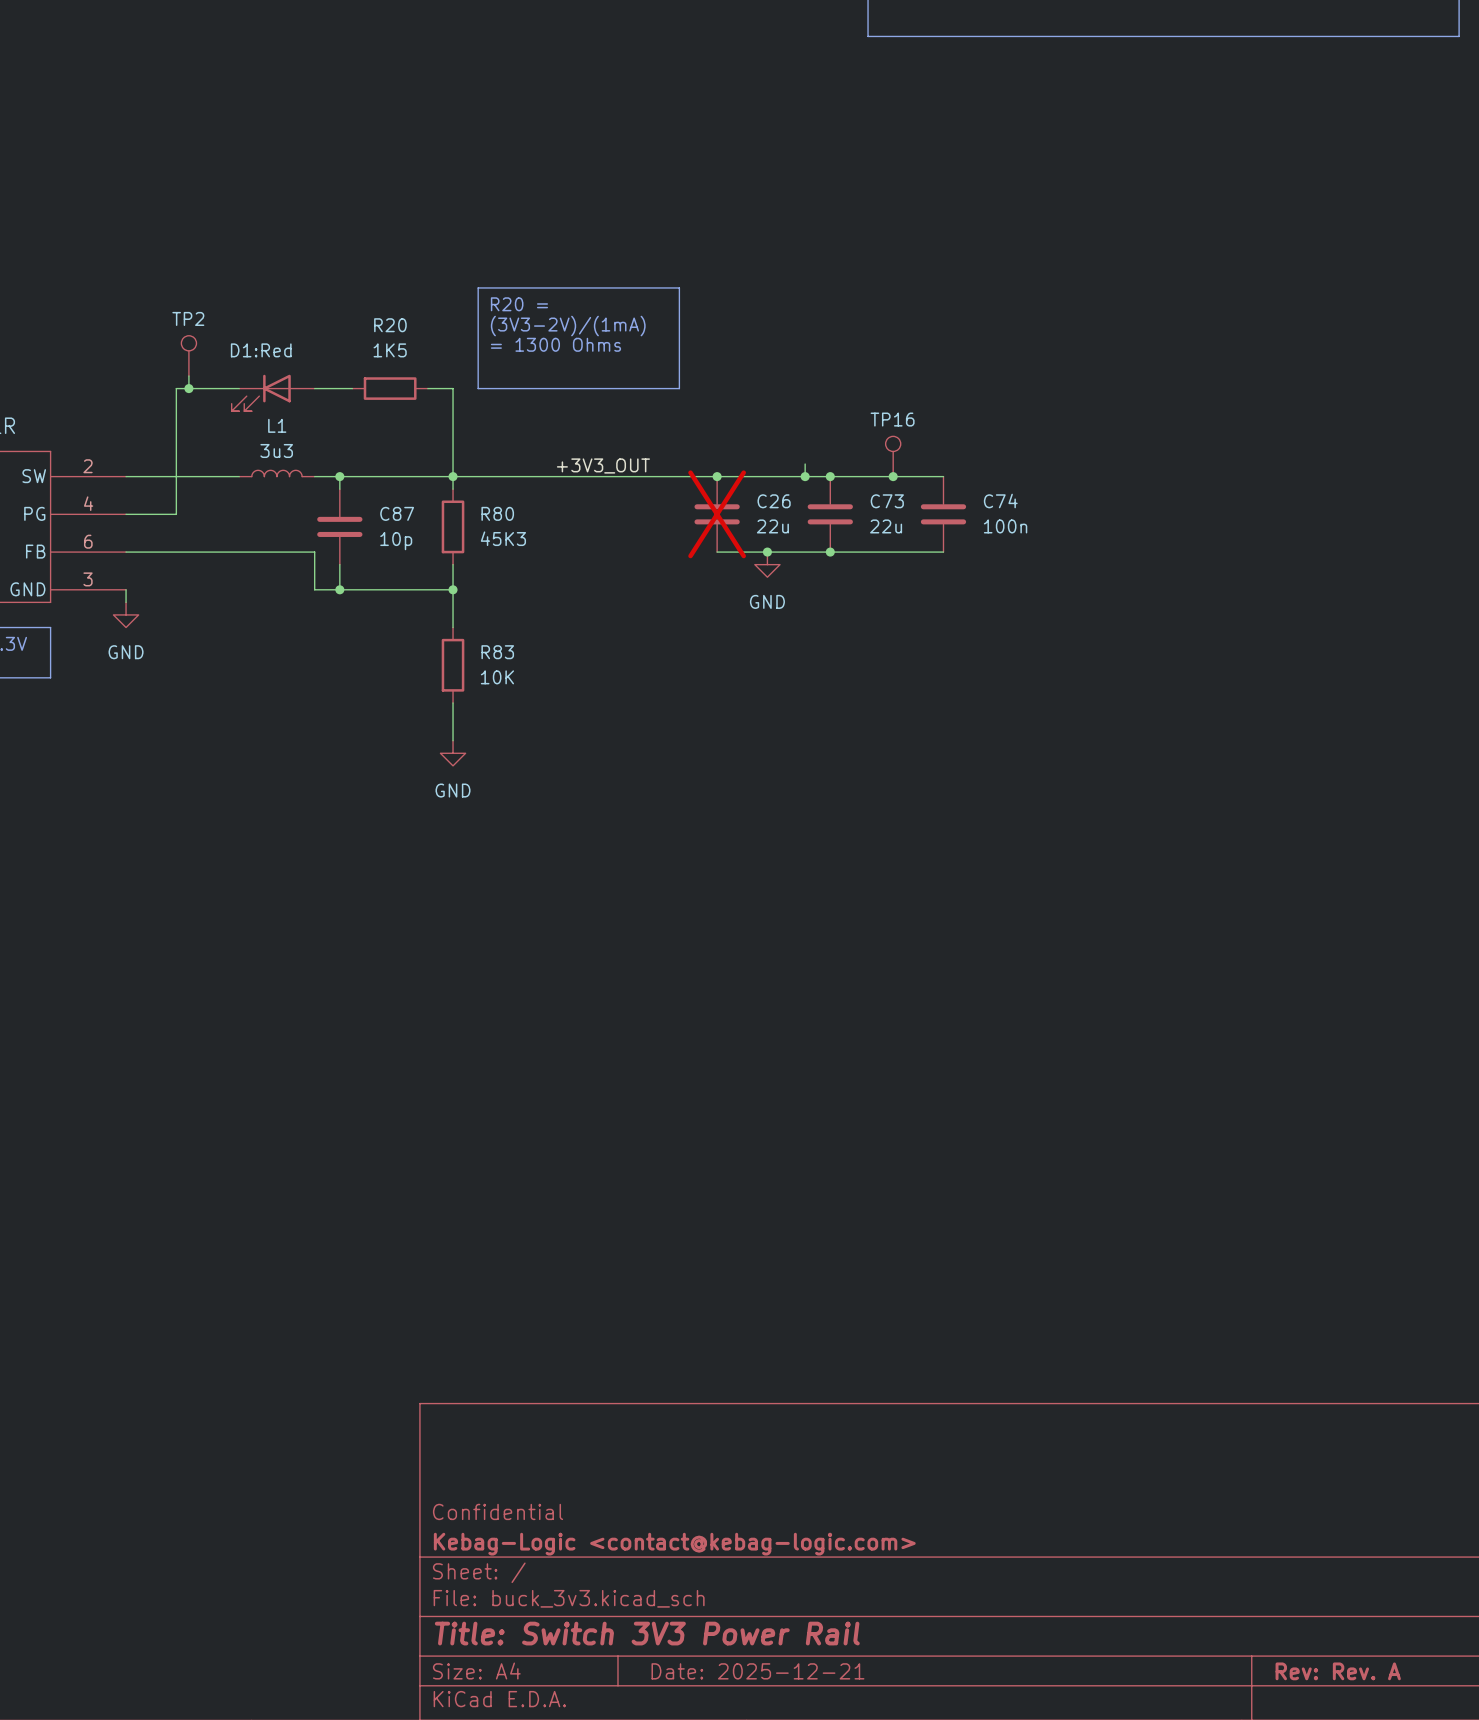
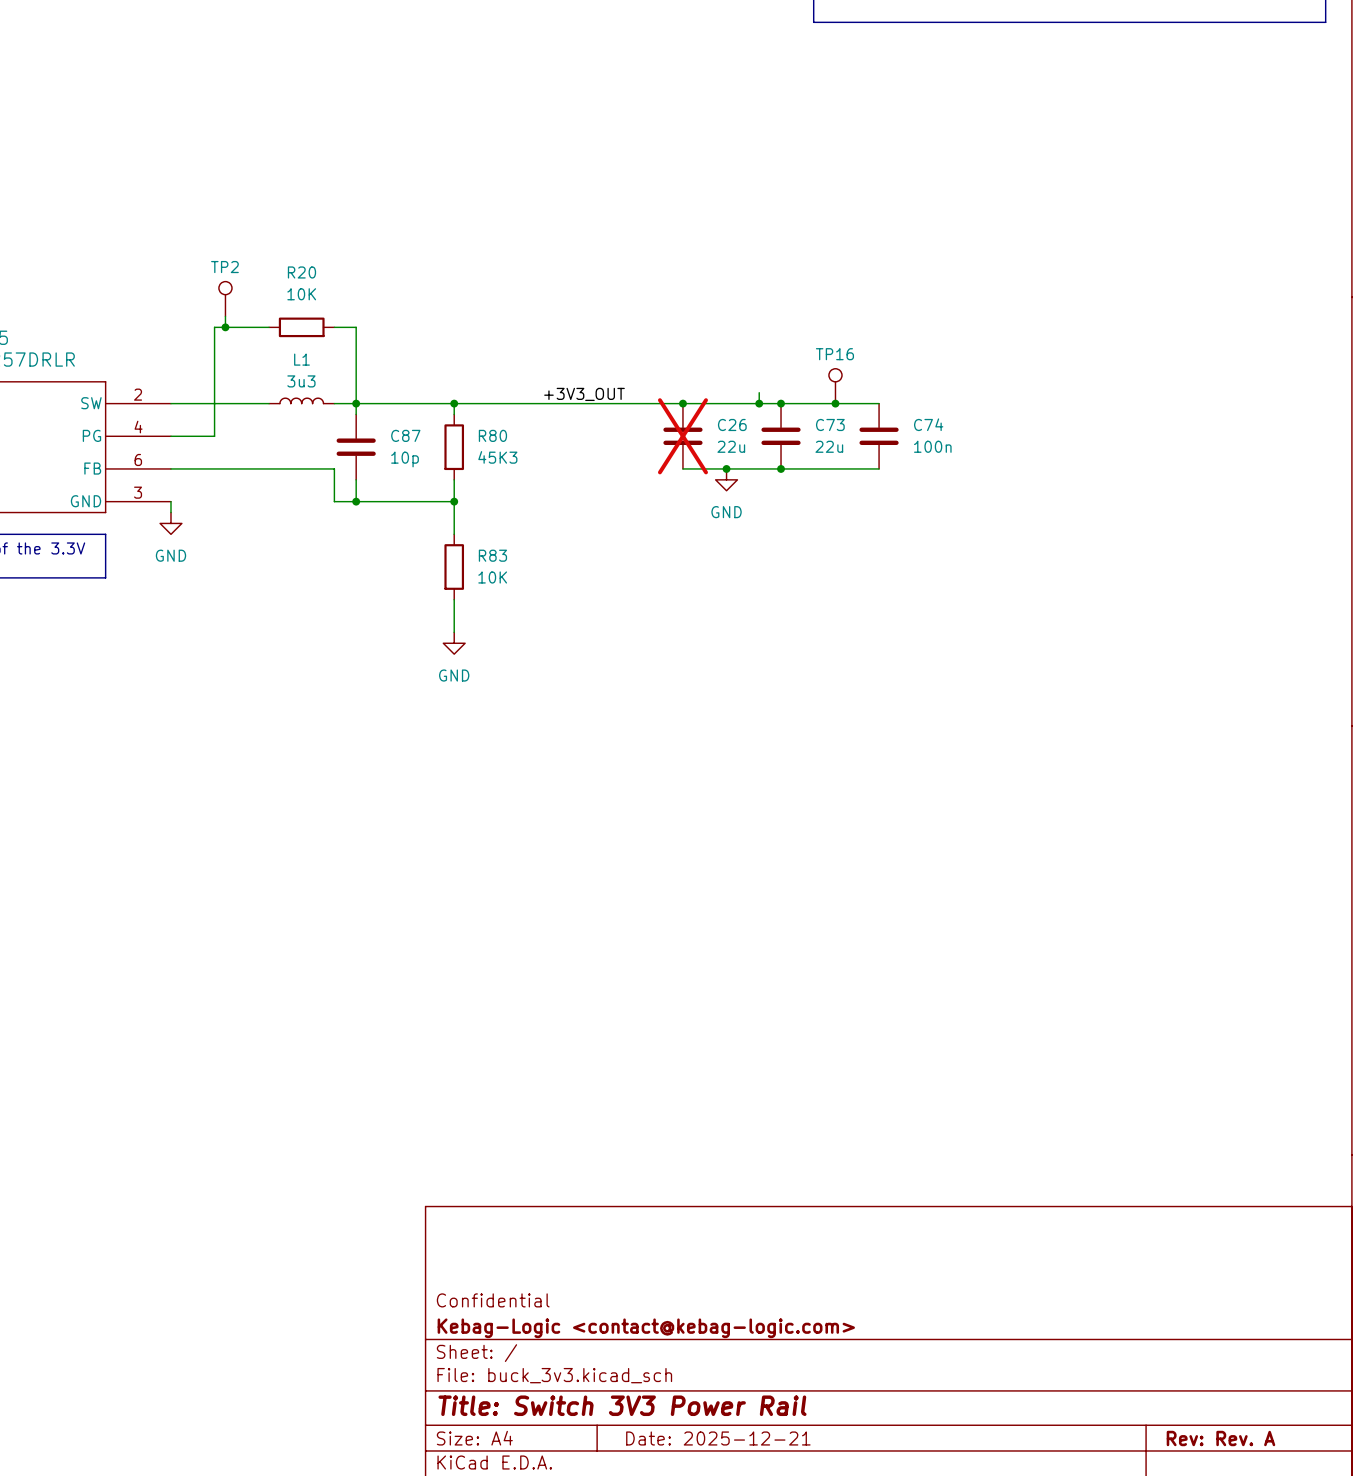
line: (478, 287) (679, 287) (679, 388) (478, 388) (478, 287) -> none
text: R20 = (519, 304) -> none
text: (3V3-2V)/(1mA) (568, 326) -> none
text: = 1300 Ohms (555, 344) -> none
R20 value: 1K5 (390, 350) -> 10K (301, 294)
wire: (339, 388) (352, 388) -> (356, 327) (356, 403)
R20 position: (390, 388) -> (301, 327)
wire: (427, 388) (453, 388) (453, 476) -> none
part: (273, 392) -> none

